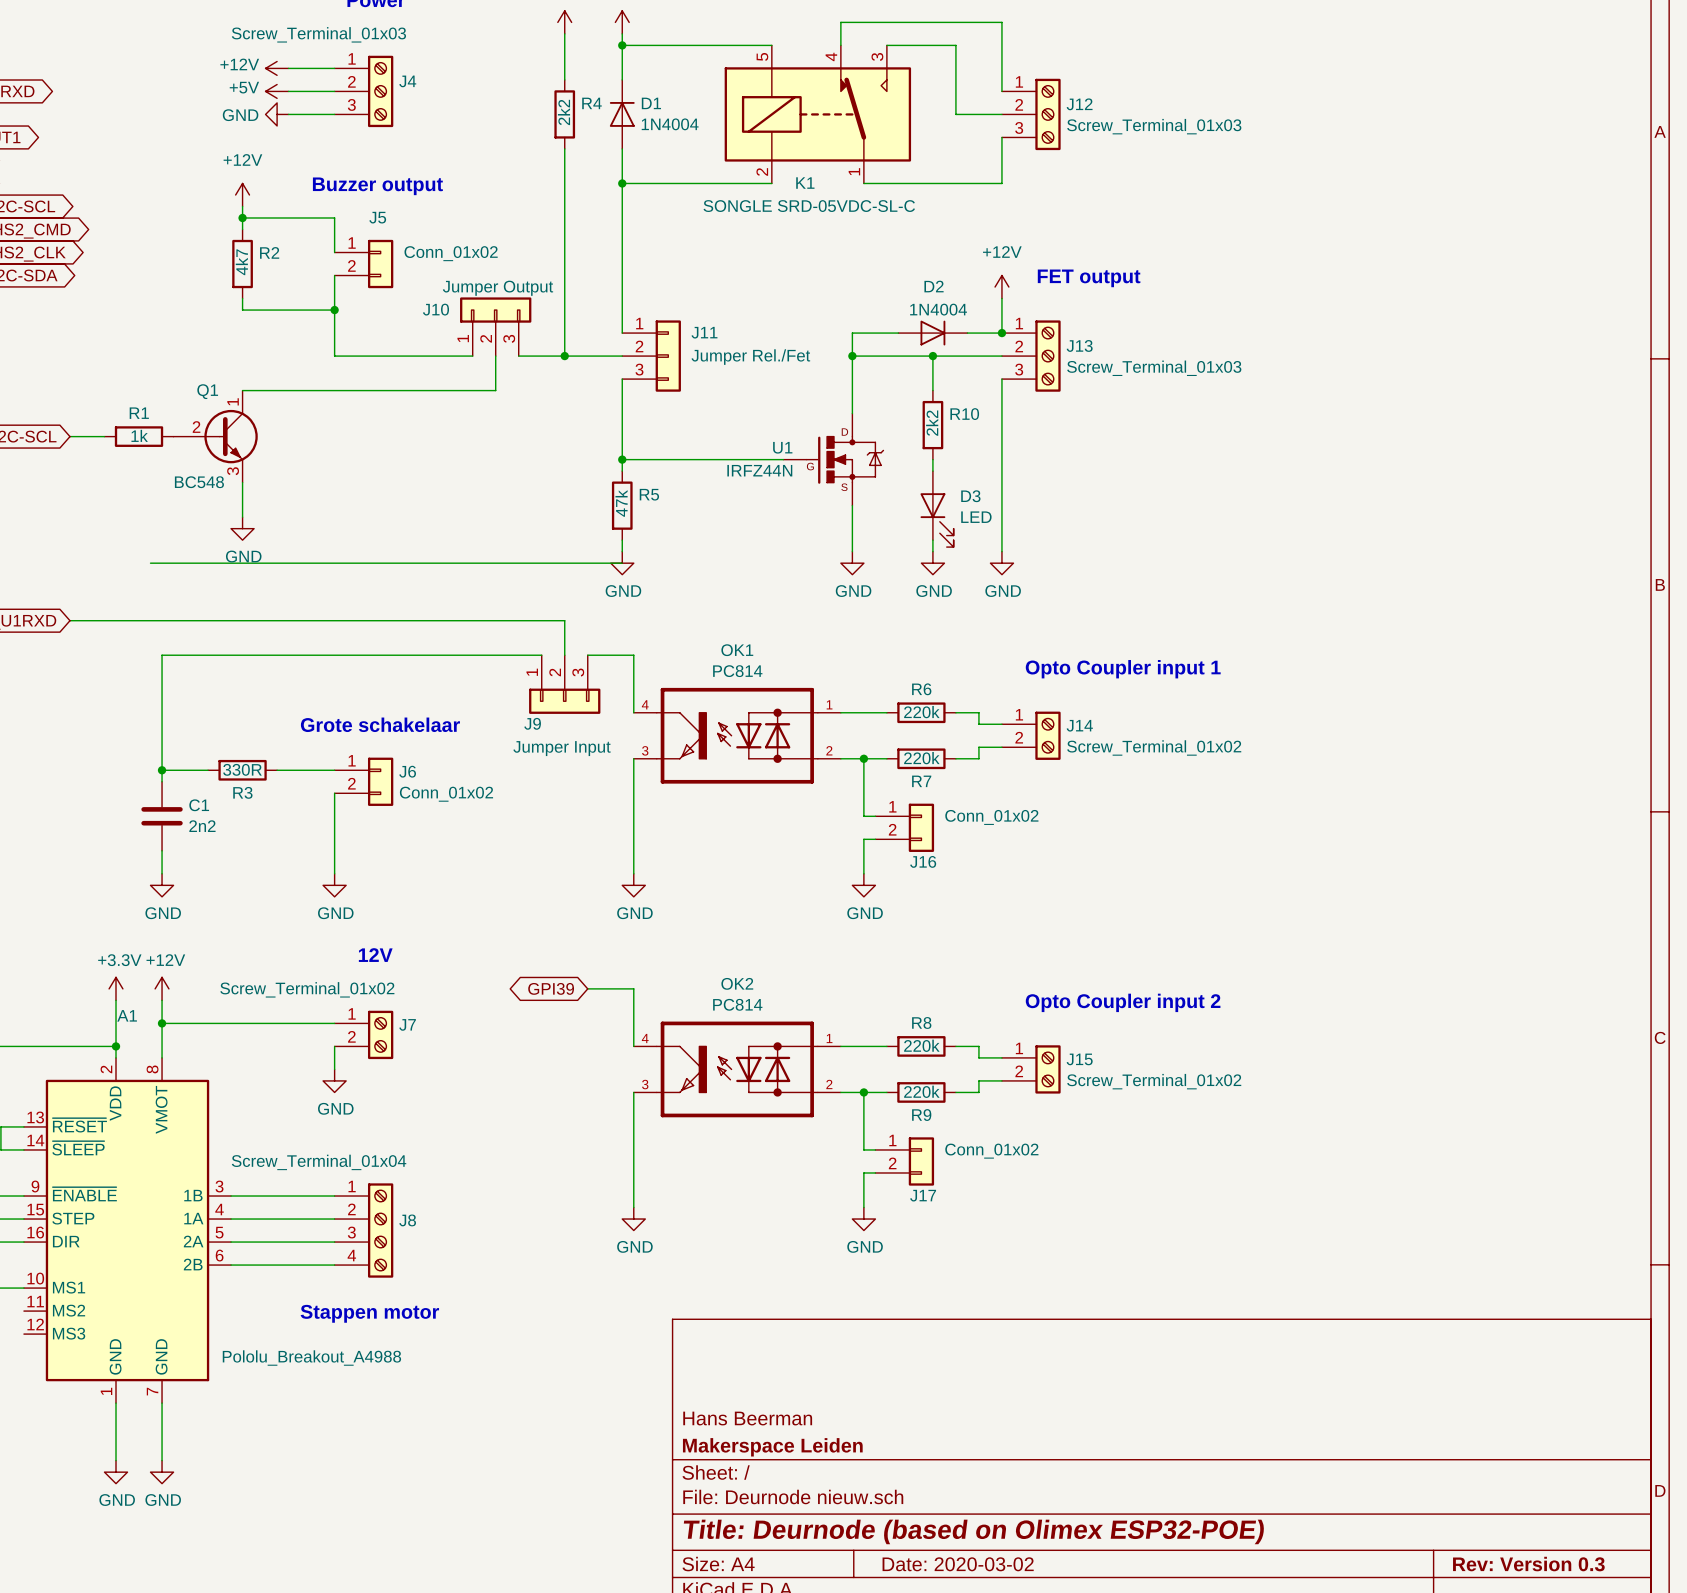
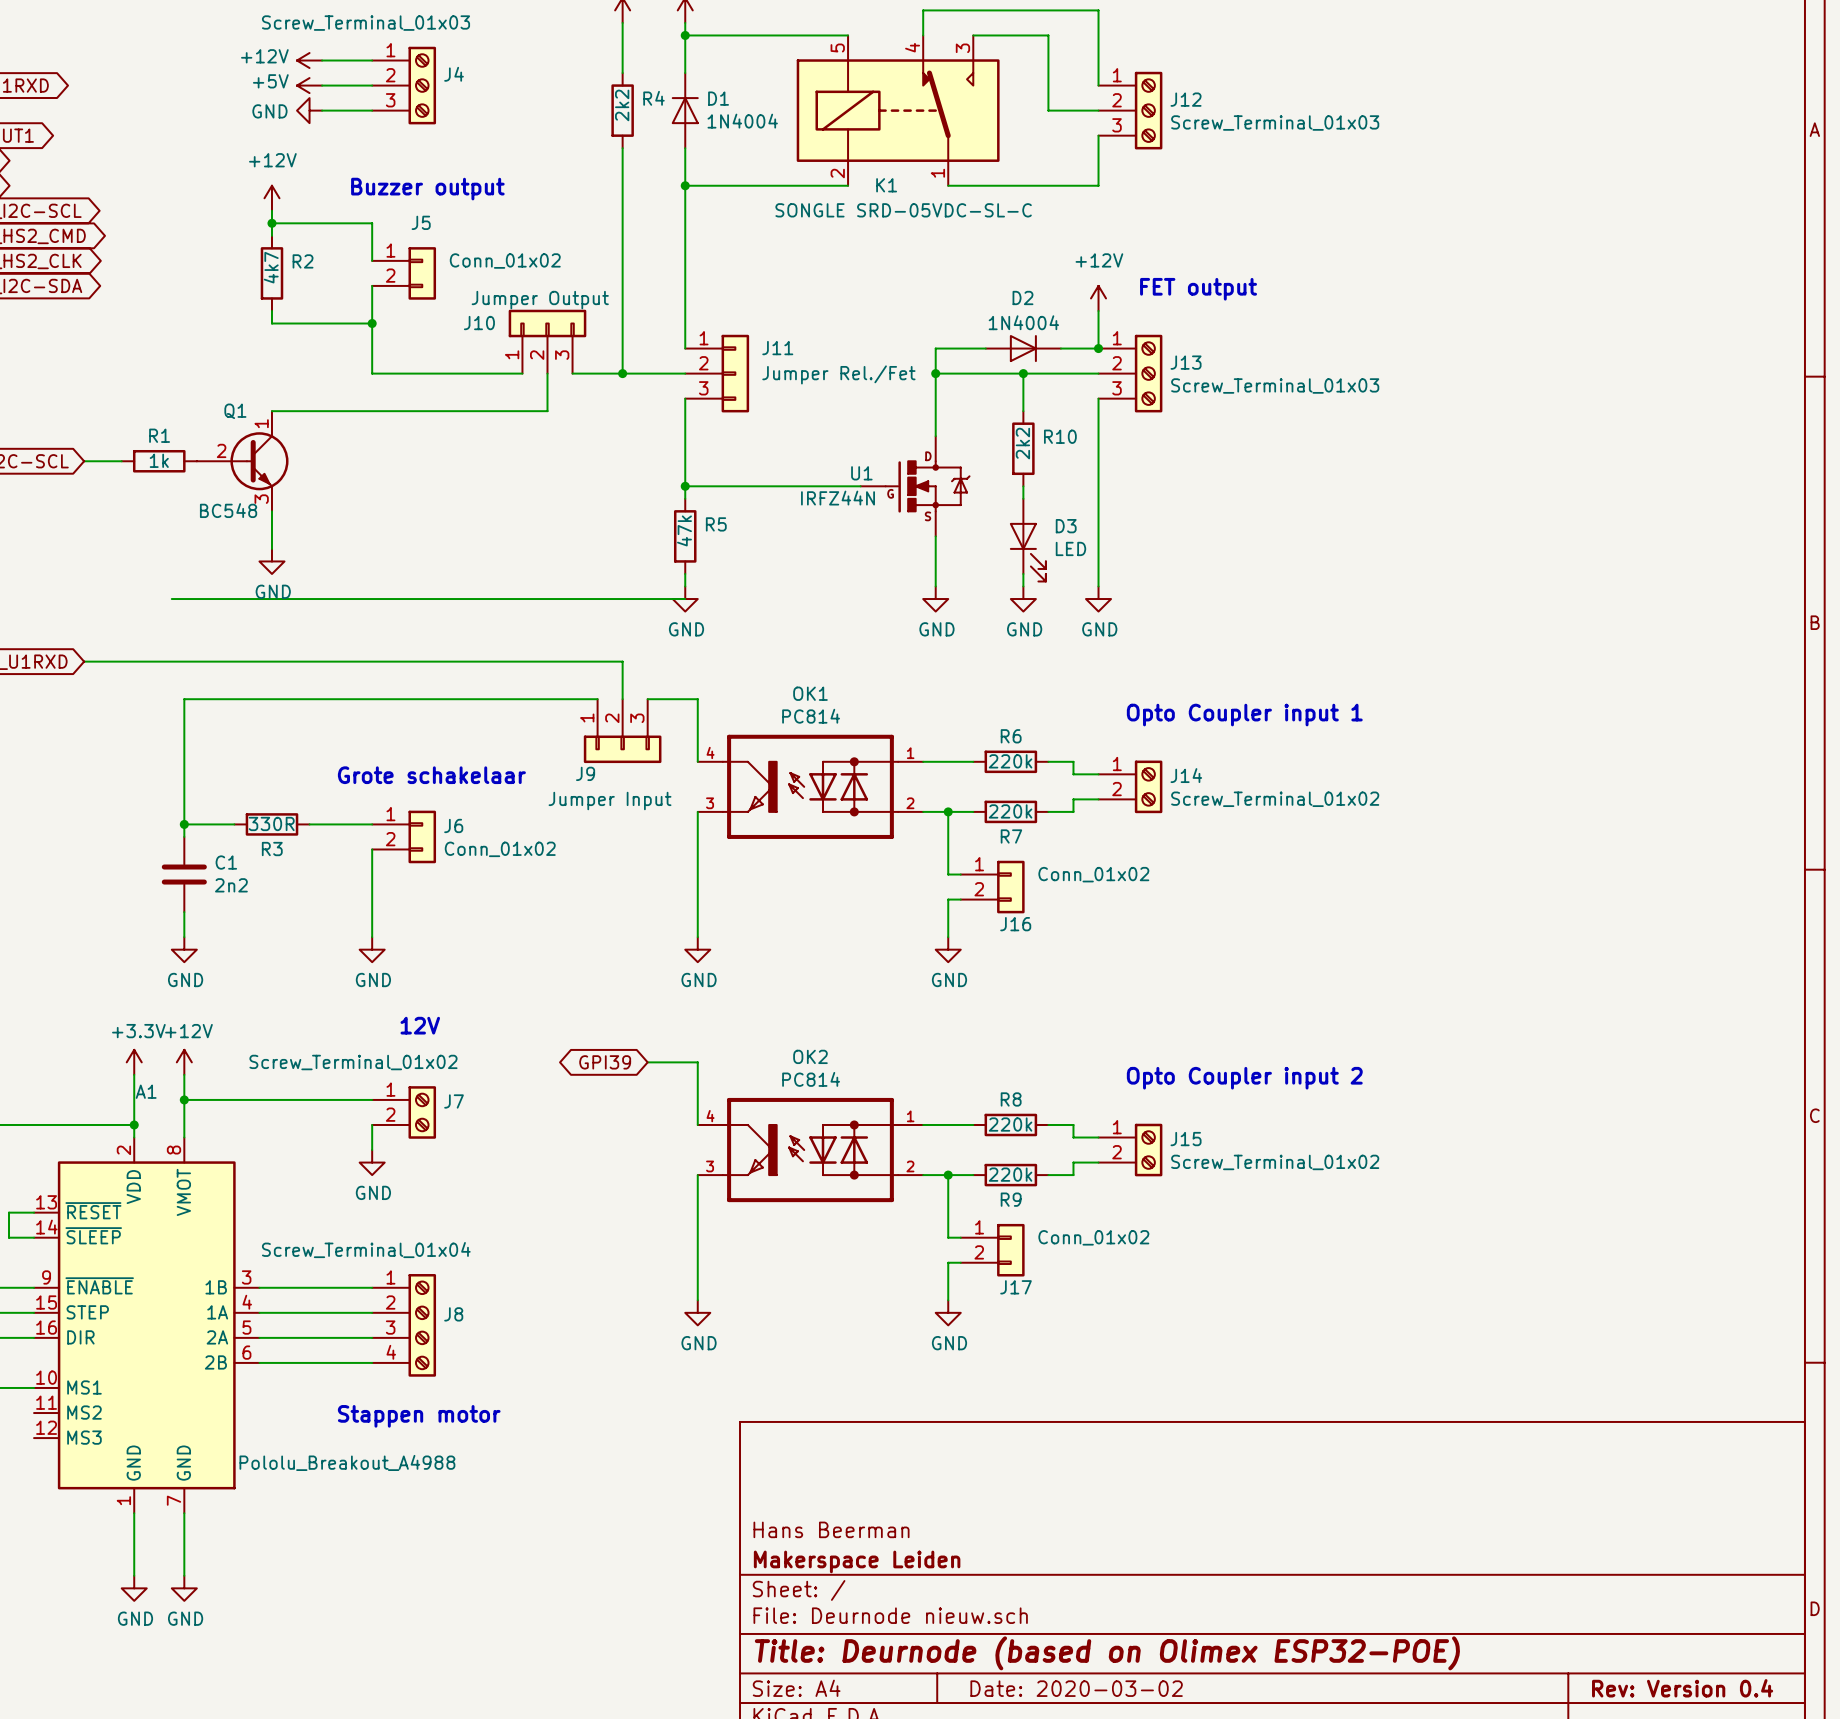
title block: Rev: Version 0.3 (1528, 1564) -> Rev: Version 0.4 (1682, 1688)

